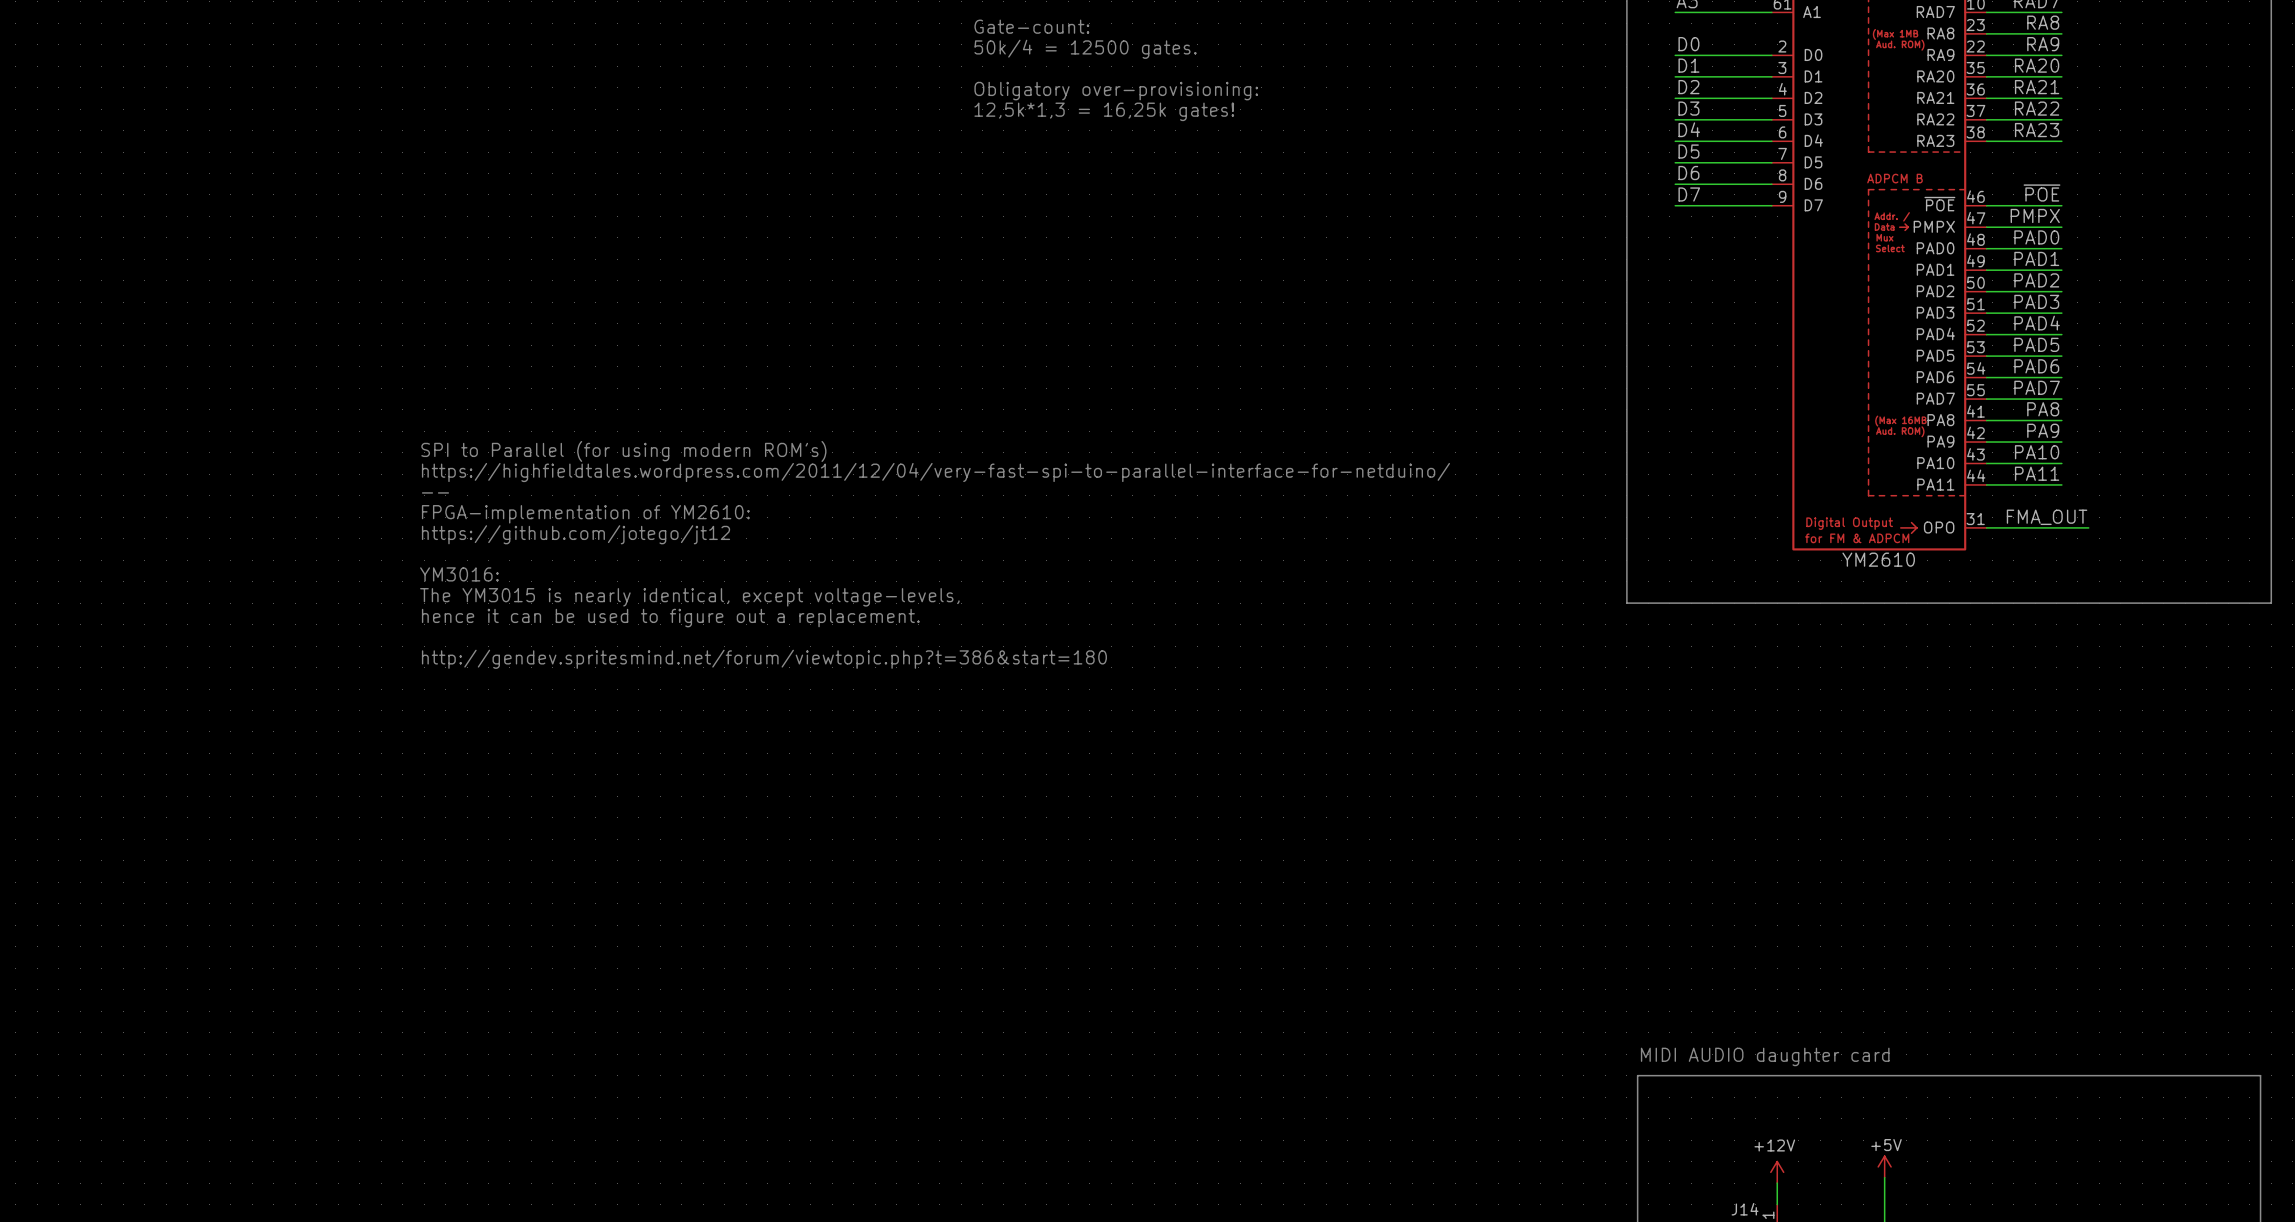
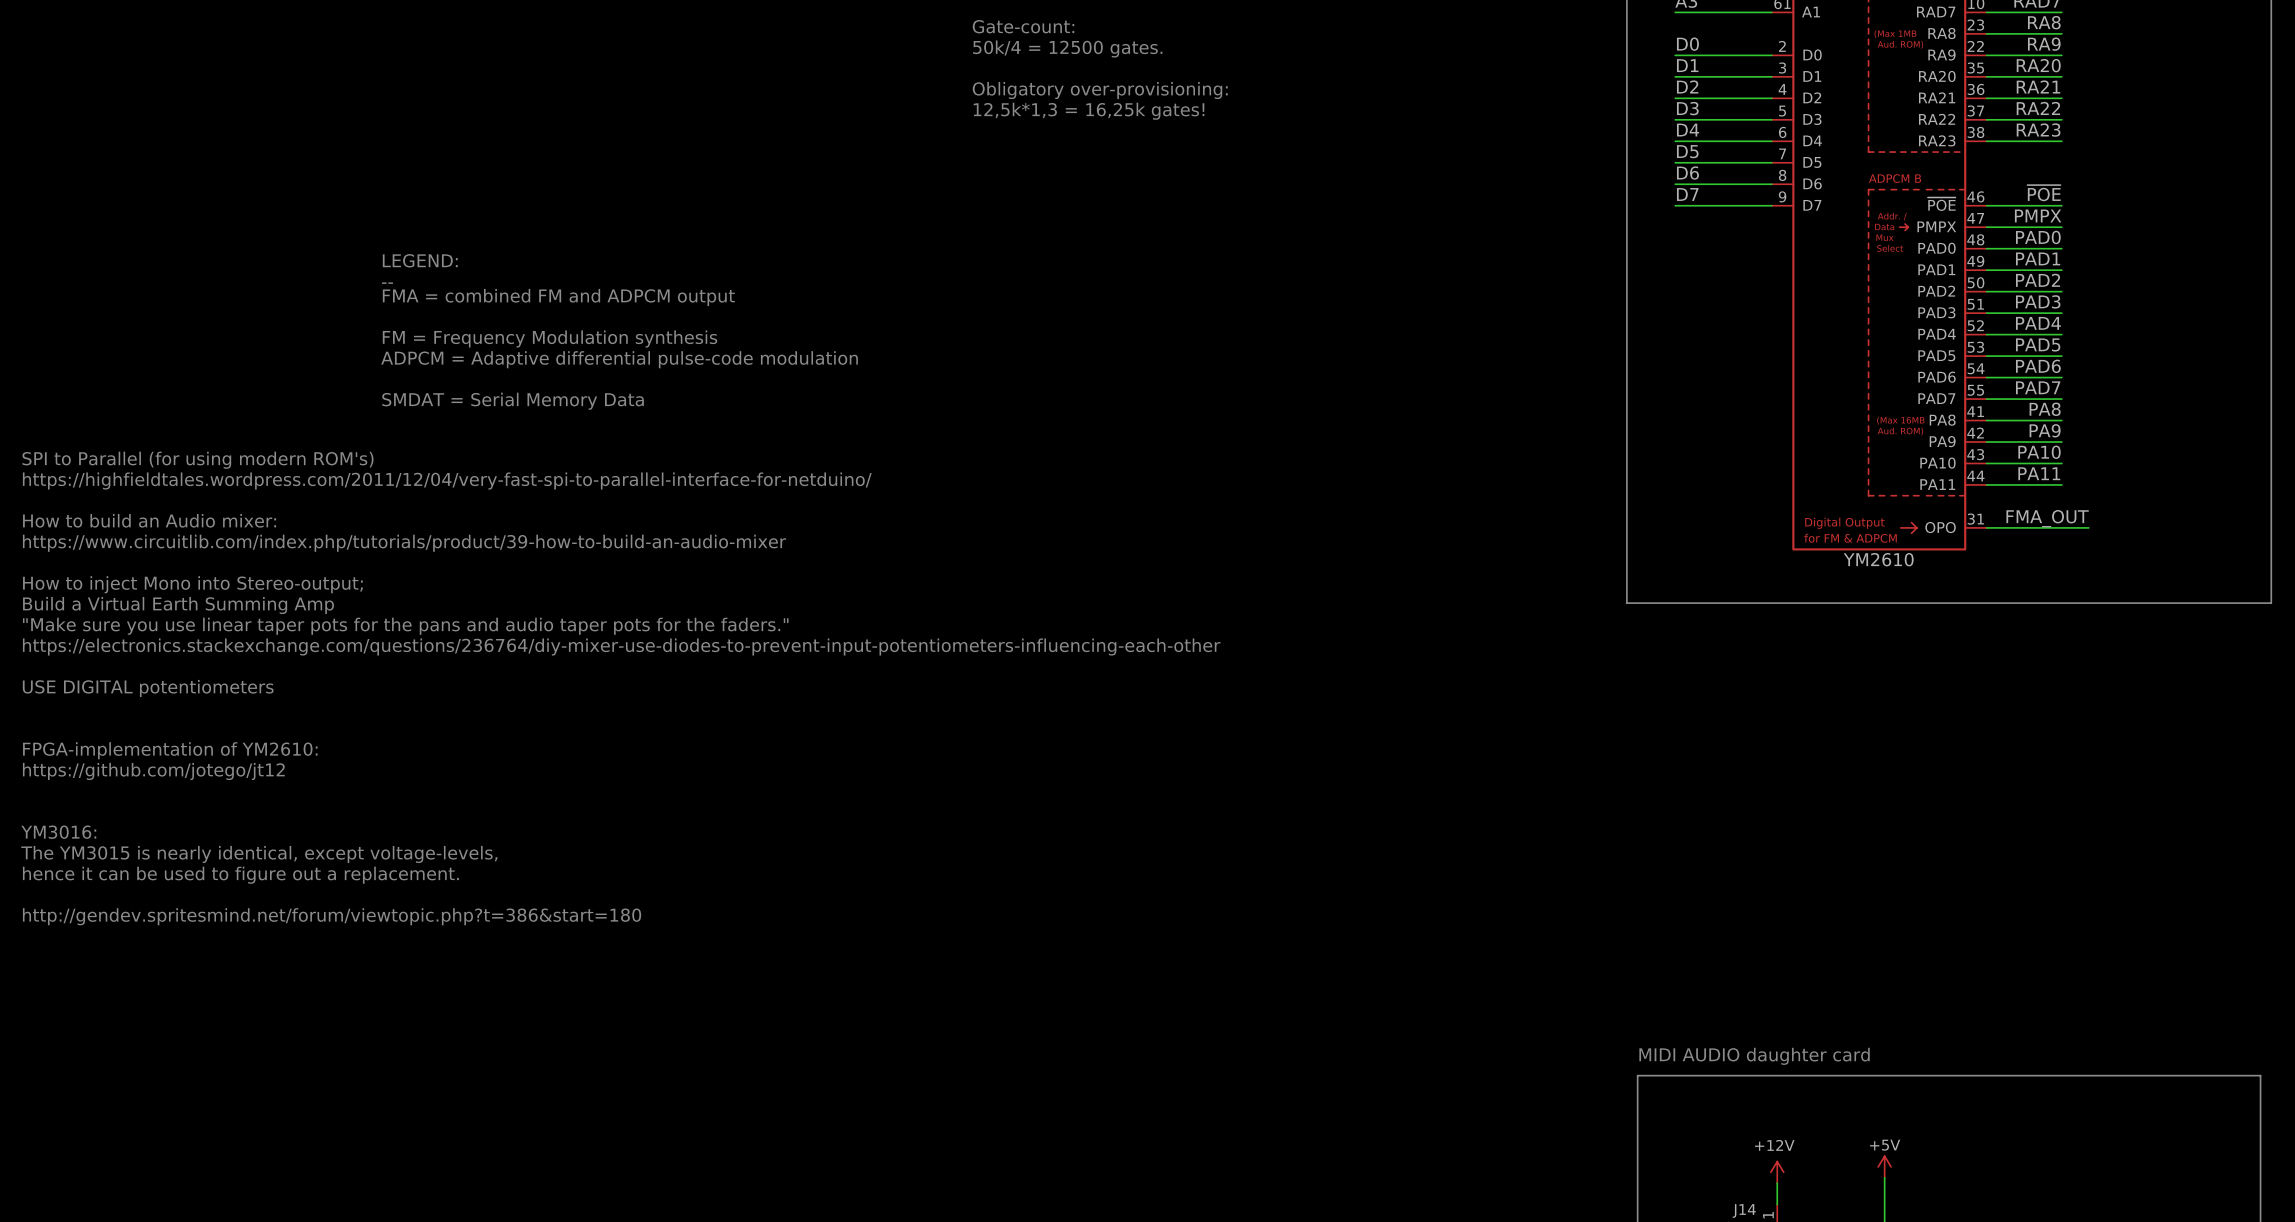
text: none -> LEGEND: (420, 260)
text: none -> -- (387, 283)
text: none -> FMA = combined FM and ADPCM output (558, 297)
text: none -> FM = Frequency Modulation synthesis (550, 338)
text: none -> ADPCM = Adaptive differential pulse-code modulation (619, 359)
text: none -> SMDAT = Serial Memory Data (513, 401)
text: SPI to Parallel (for using modern ROM's) (623, 451) -> none
text: none -> SPI to Parallel (for using modern ROM's) (197, 460)
text: https://highfieldtales.wordpress.com/2011/12/04/very-fast-spi-to-parallel-interface-for-netduino/ (935, 472) -> none
text: none -> https://highfieldtales.wordpress.com/2011/12/04/very-fast-spi-to-parallel-interface-for-netduino/ (447, 480)
text: -- (435, 492) -> none
text: FPGA-implementation of YM2610: (585, 514) -> none
text: none -> How to build an Audio mixer: (149, 520)
text: https://github.com/jotego/jt12 (576, 534) -> none
text: none -> https://www.circuitlib.com/index.php/tutorials/product/39-how-to-build-an-audio-mixer (404, 543)
text: YM3016: (459, 574) -> none
text: none -> How to inject Mono into Stereo-output; (192, 584)
text: The YM3015 is nearly identical, except voltage-levels, (689, 597) -> none
text: none -> Build a Virtual Earth Summing Amp (178, 605)
text: hence it can be used to figure out a replacement. (670, 618) -> none
text: none -> "Make sure you use linear taper pots for the pans and audio taper pots for the faders." (405, 626)
text: none -> https://electronics.stackexchange.com/questions/236764/diy-mixer-use-diodes-to-prevent-input-potentiometers-influencing-each-other (621, 646)
text: http://gendev.spritesmind.net/forum/viewtopic.php?t=386&start=180 (764, 659) -> none
text: none -> USE DIGITAL potentiometers (148, 688)
text: none -> FPGA-implementation of YM2610: (170, 750)
text: none -> https://github.com/jotego/jt12 (153, 771)
text: none -> YM3016: (58, 832)
text: none -> The YM3015 is nearly identical, except voltage-levels, (259, 854)
text: none -> hence it can be used to figure out a replacement. (240, 875)
text: none -> http://gendev.spritesmind.net/forum/viewtopic.php?t=386&start=180 (332, 916)

